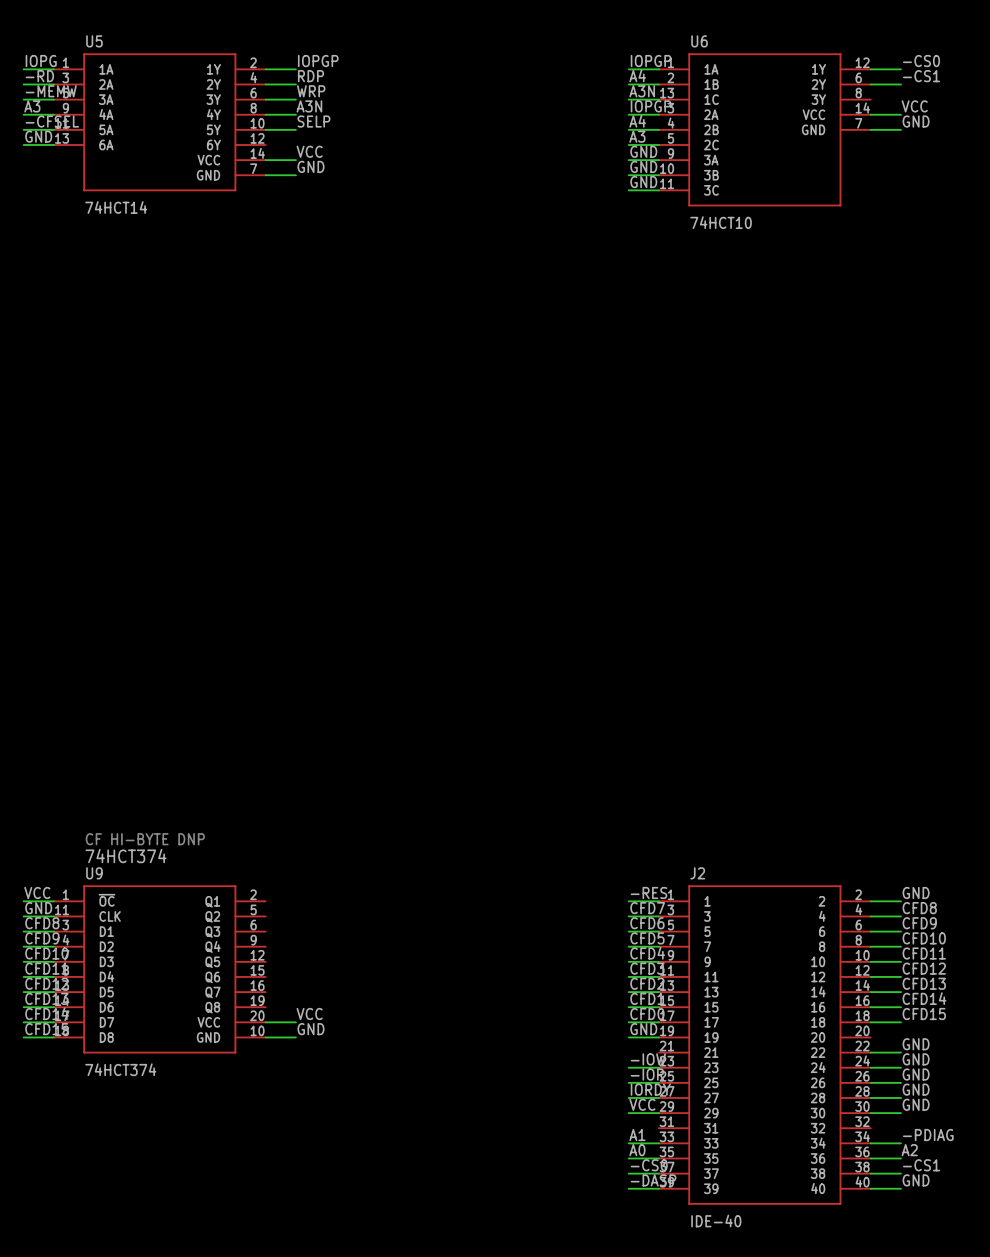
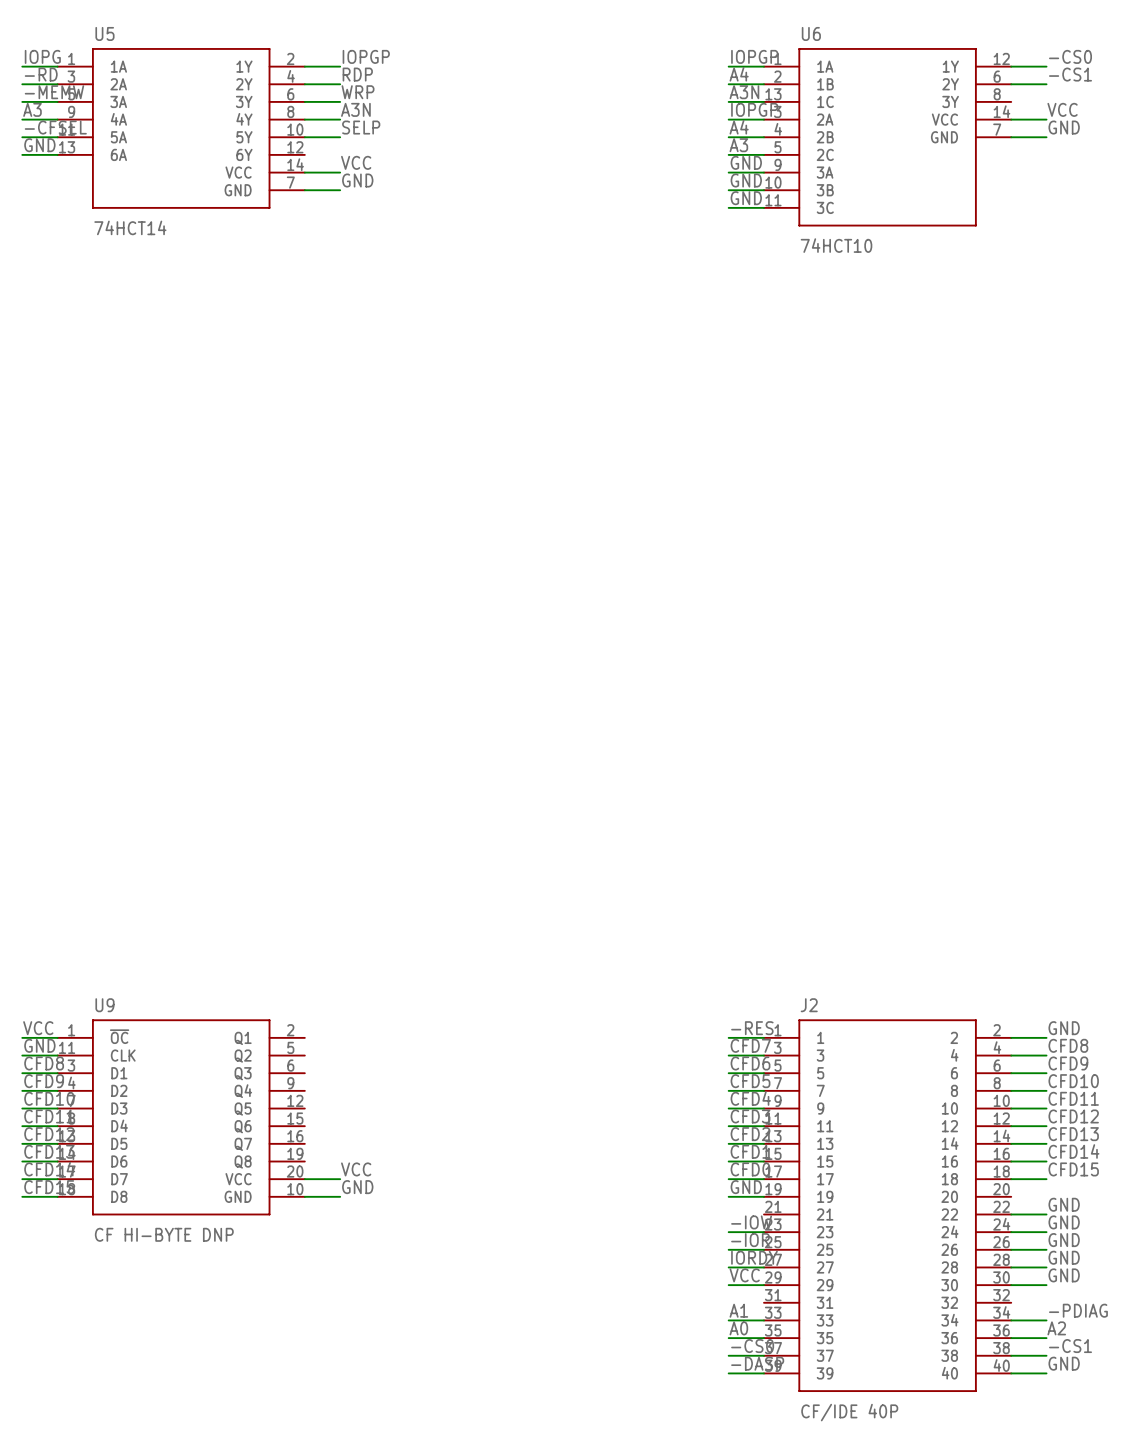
text: CF HI-BYTE DNP (145, 839) -> none
text: 74HCT374 (126, 856) -> none
U9 value: 74HCT374 (120, 1069) -> CF HI-BYTE DNP (164, 1234)
J2 value: IDE-40 (716, 1221) -> CF/IDE 40P (849, 1412)

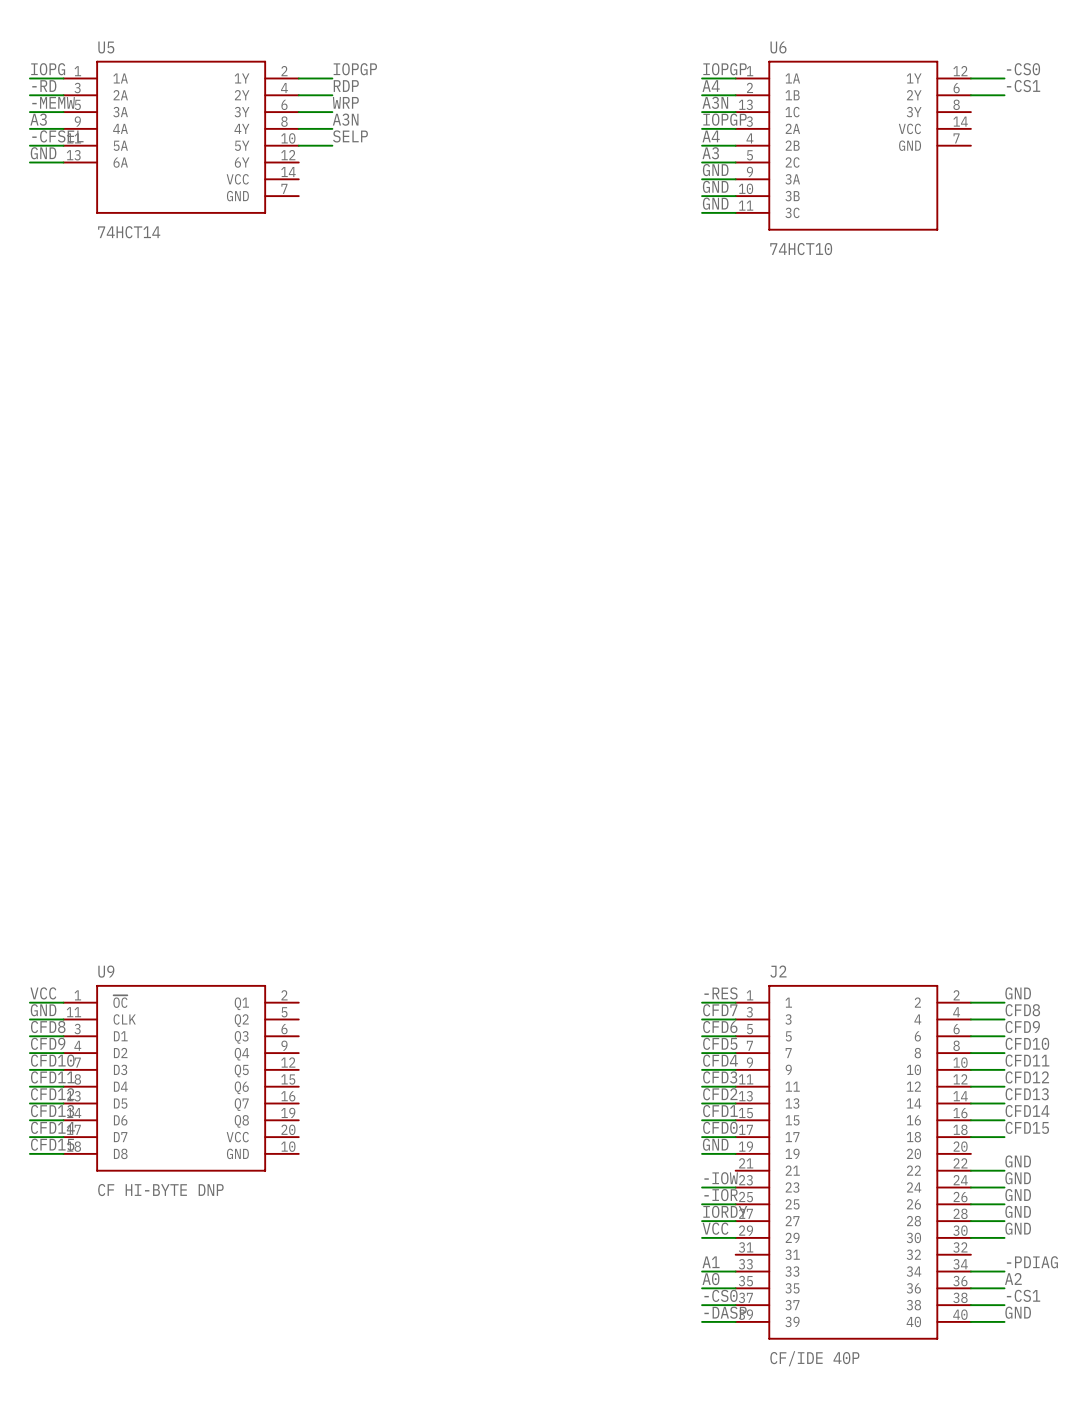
label: VCC (1062, 109) -> none
wire: (1011, 119) (1046, 119) -> none
label: GND (1064, 127) -> none
wire: (1011, 137) (1046, 137) -> none
label: VCC (356, 162) -> none
wire: (304, 172) (340, 172) -> none
label: GND (357, 180) -> none
wire: (304, 190) (340, 190) -> none
label: VCC (356, 1169) -> none
wire: (304, 1179) (340, 1179) -> none
label: GND (357, 1187) -> none
wire: (304, 1196) (340, 1196) -> none

